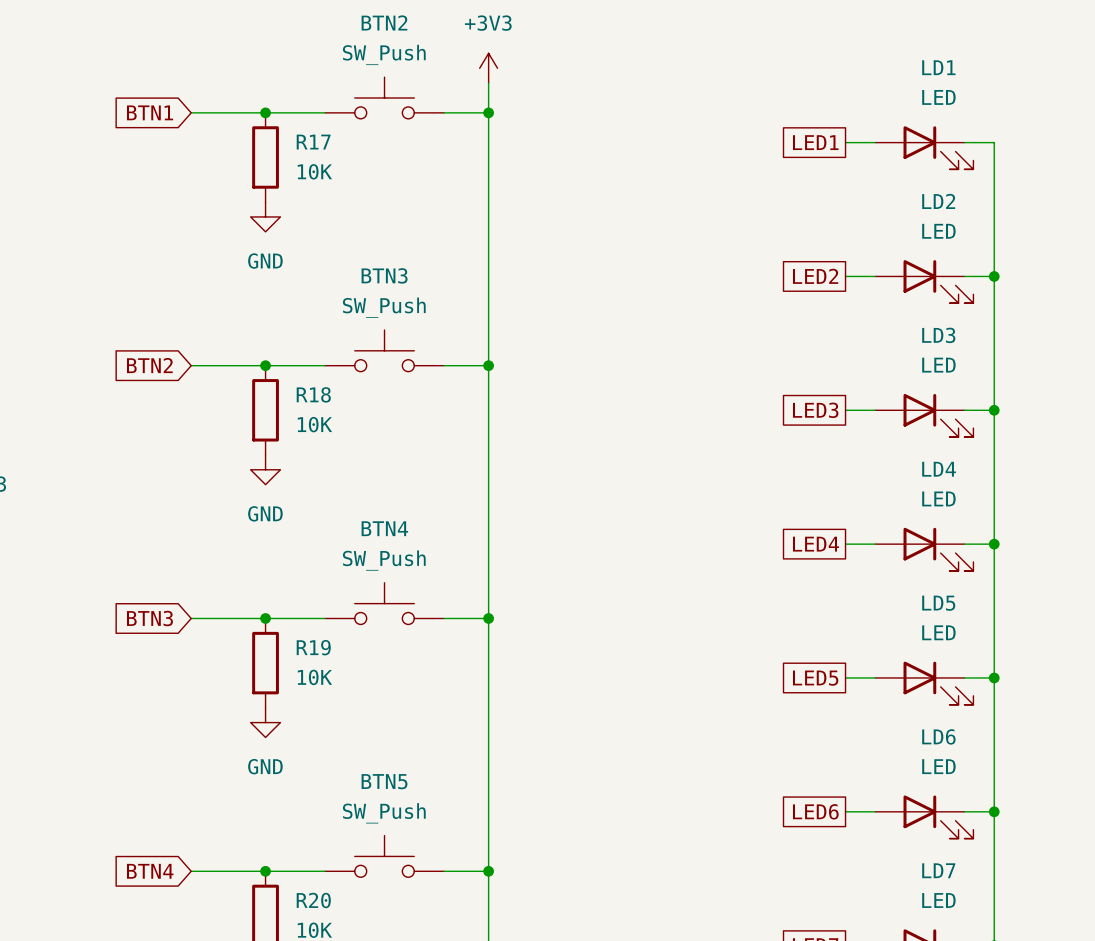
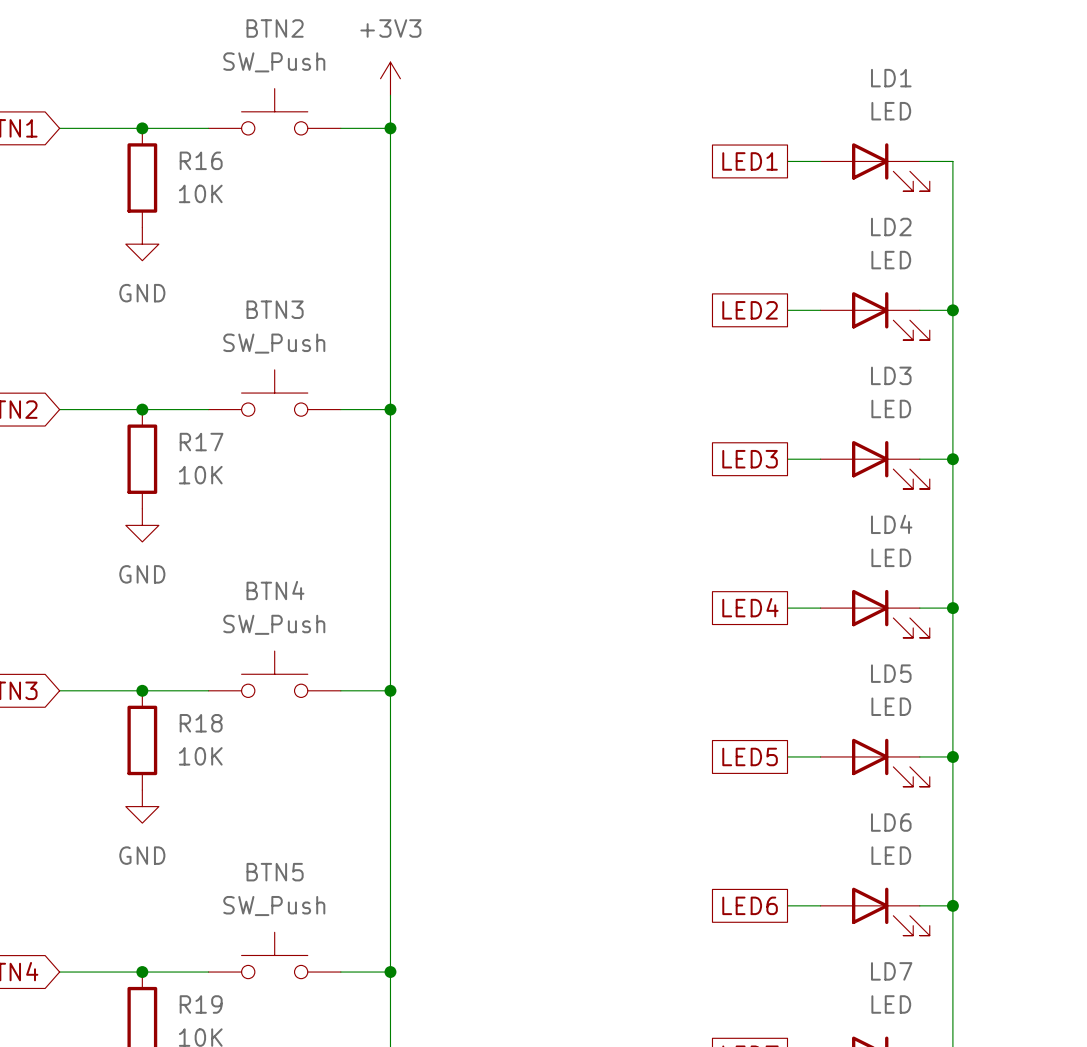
R17 name: R17 (313, 142) -> R16 (201, 160)
R18 name: R18 (313, 394) -> R17 (201, 442)
R19 name: R19 (313, 647) -> R18 (201, 723)
R20 name: R20 (313, 900) -> R19 (201, 1004)

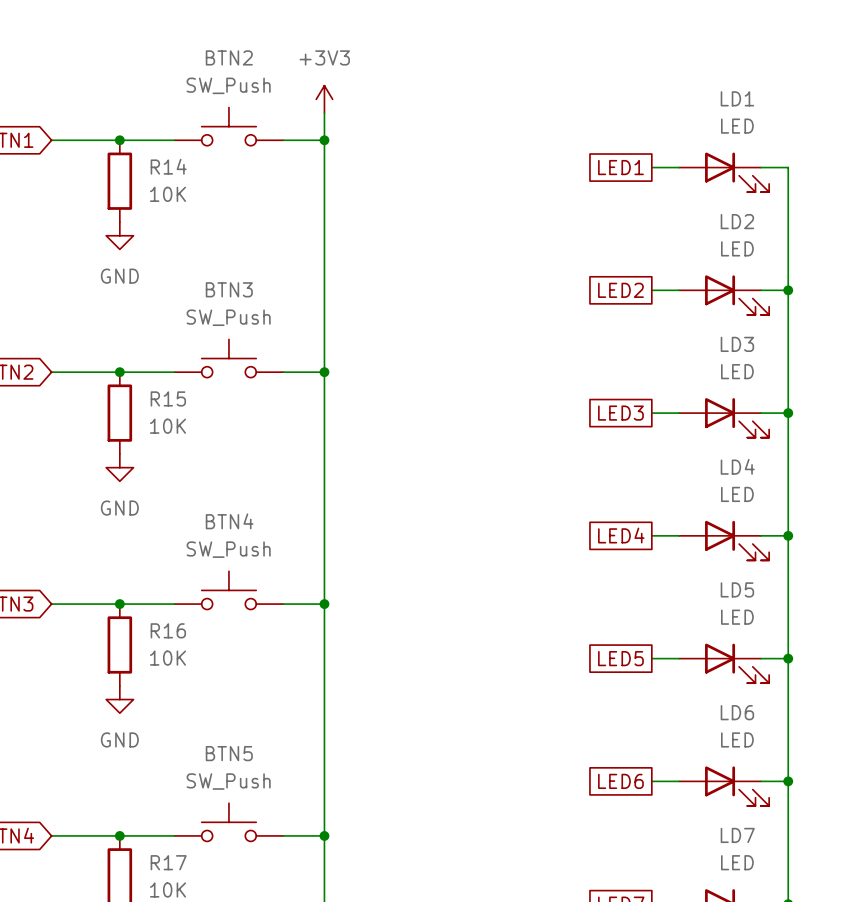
R16 name: R16 (201, 160) -> R14 (168, 166)
R17 name: R17 (201, 442) -> R15 (168, 398)
R18 name: R18 (201, 723) -> R16 (168, 630)
R19 name: R19 (201, 1004) -> R17 (168, 862)

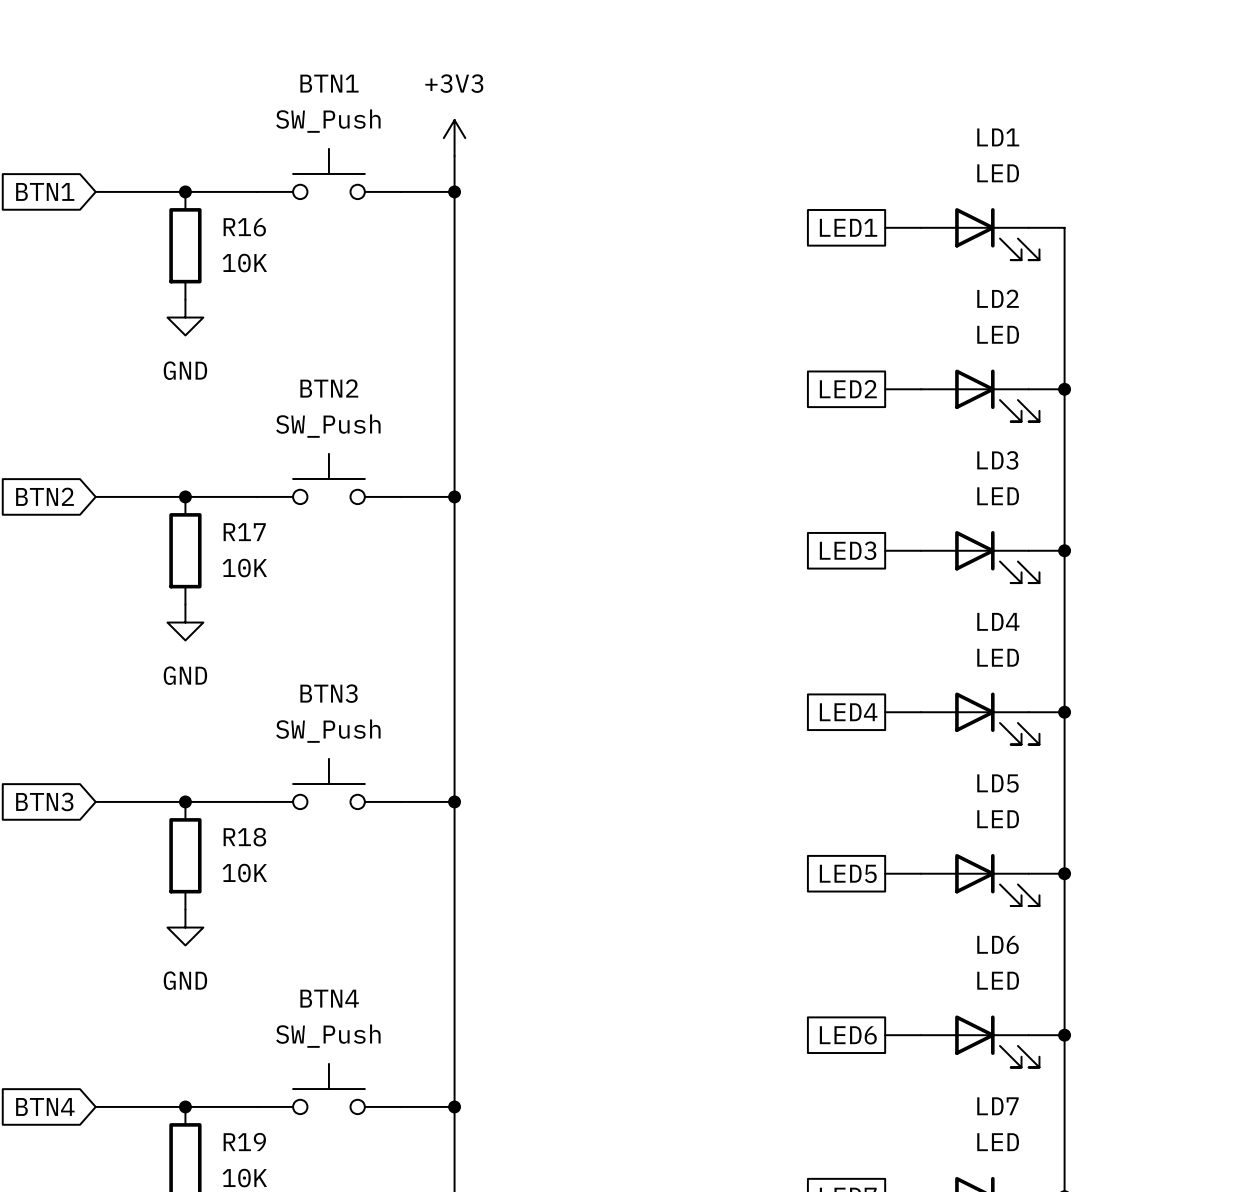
BTN2 name: BTN2 (229, 57) -> BTN1 (329, 83)
R14 name: R14 (168, 166) -> R16 (244, 227)
BTN3 name: BTN3 (229, 289) -> BTN2 (329, 388)
R15 name: R15 (168, 398) -> R17 (244, 532)
BTN4 name: BTN4 (229, 521) -> BTN3 (329, 693)
R16 name: R16 (168, 630) -> R18 (244, 837)
BTN5 name: BTN5 (229, 753) -> BTN4 (329, 998)
R17 name: R17 (168, 862) -> R19 (244, 1142)

